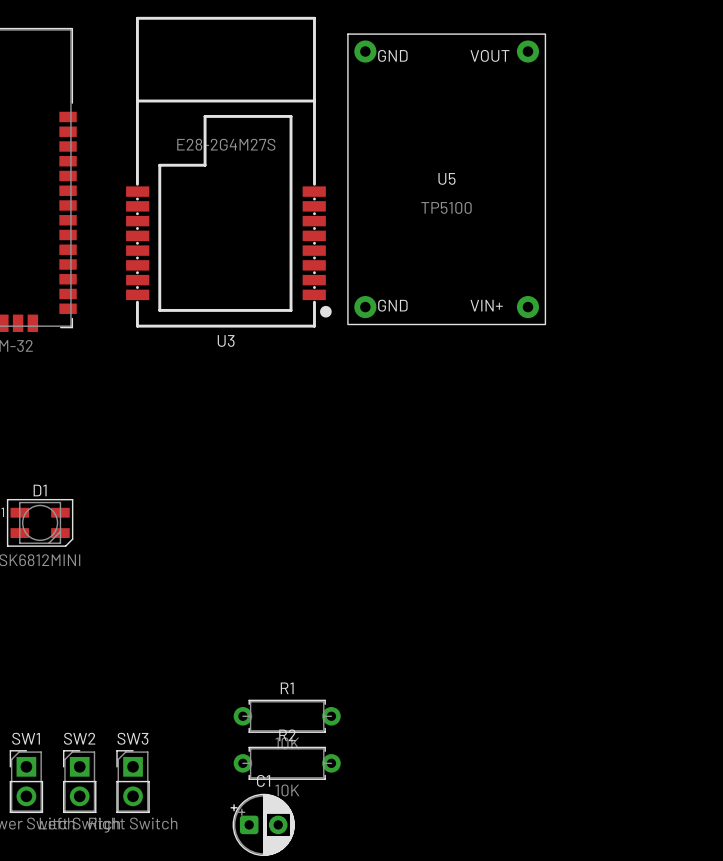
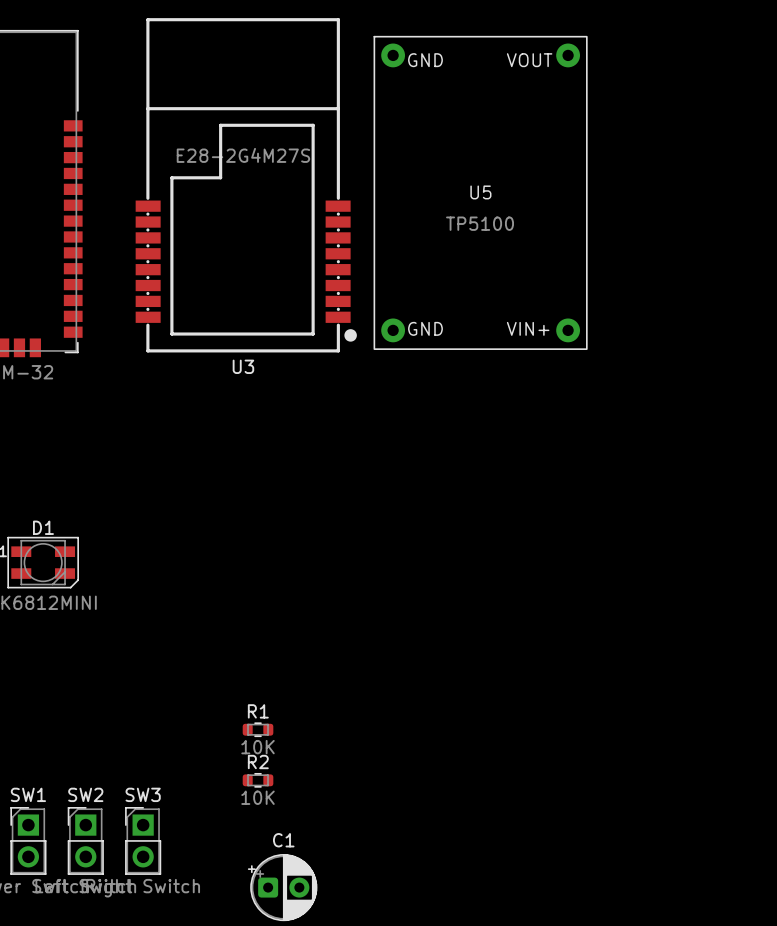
R1 footprint: [233, 699, 341, 733] -> [242, 722, 274, 738]
R2 footprint: [233, 746, 341, 780] -> [242, 773, 274, 788]

